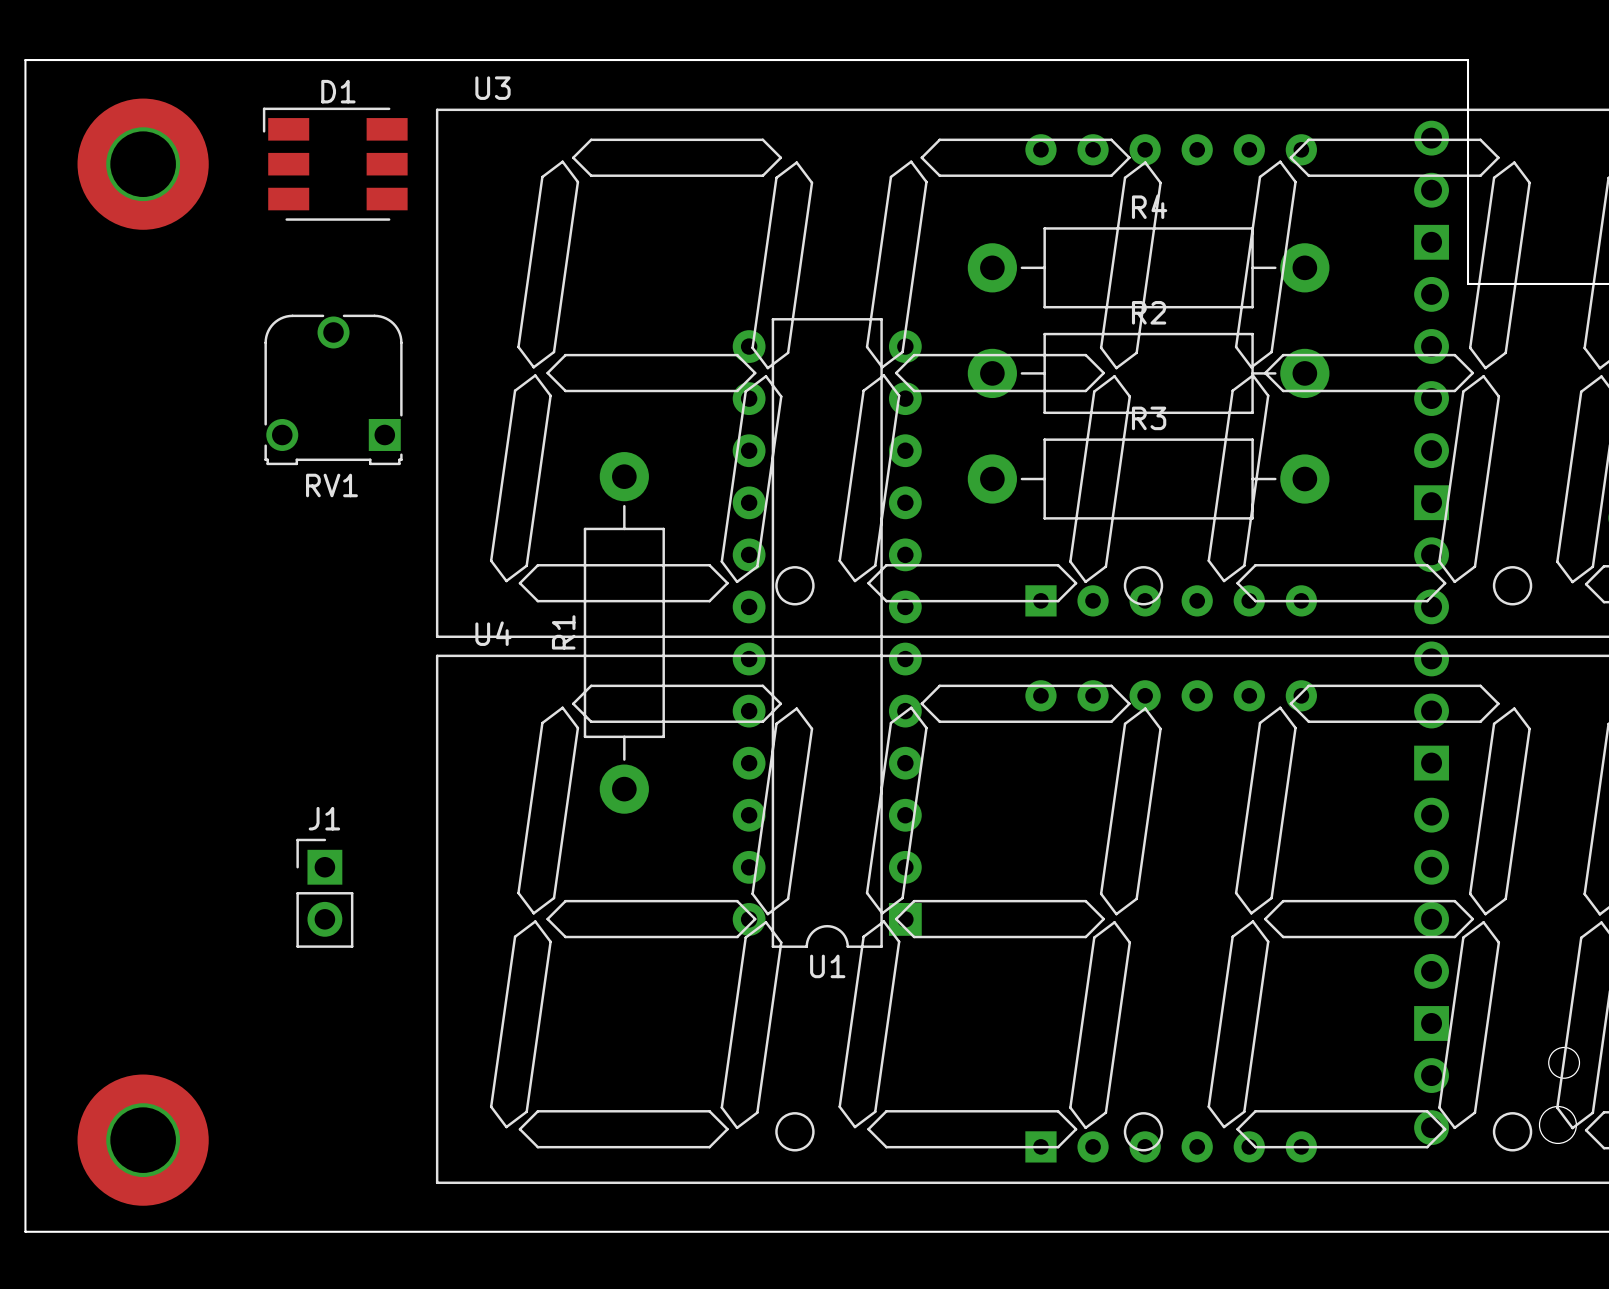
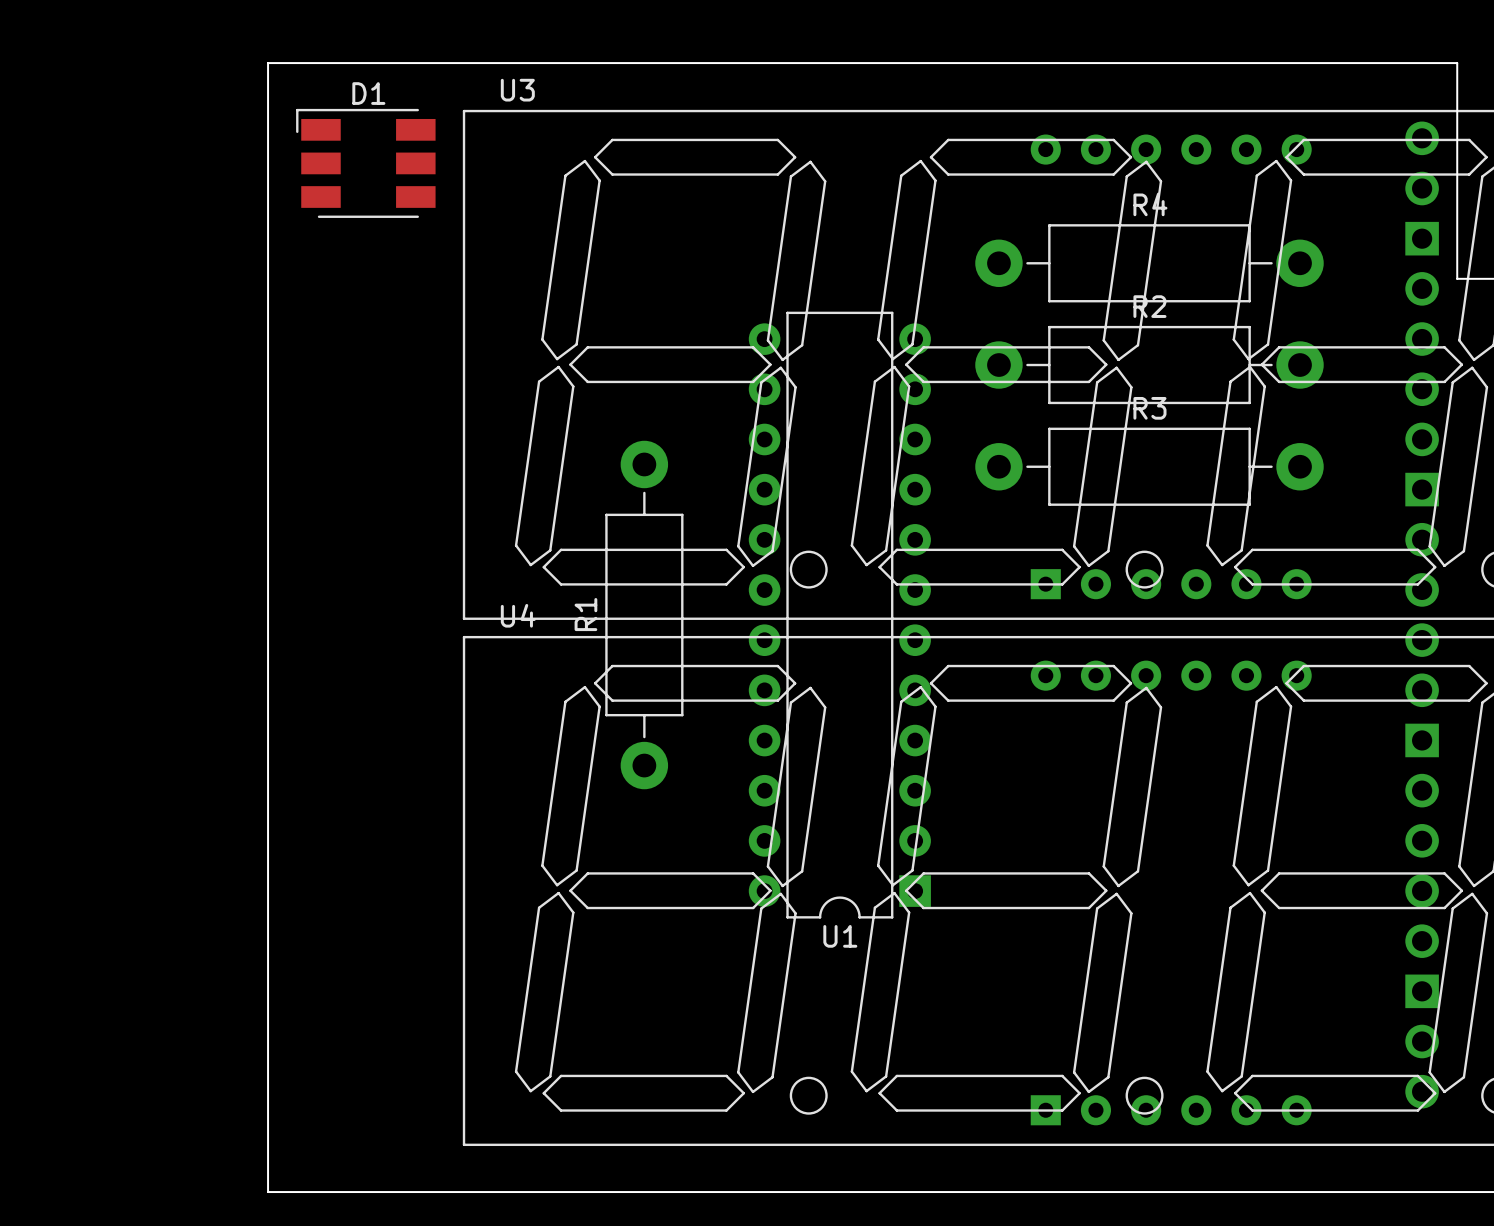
board edge: (233, 60) (25, 60) (25, 1231) (233, 1231) -> (268, 63) (268, 1192)
part: (143, 164) -> none
RV1: (333, 389) -> none
J1: (324, 893) -> none
part: (143, 1140) -> none

